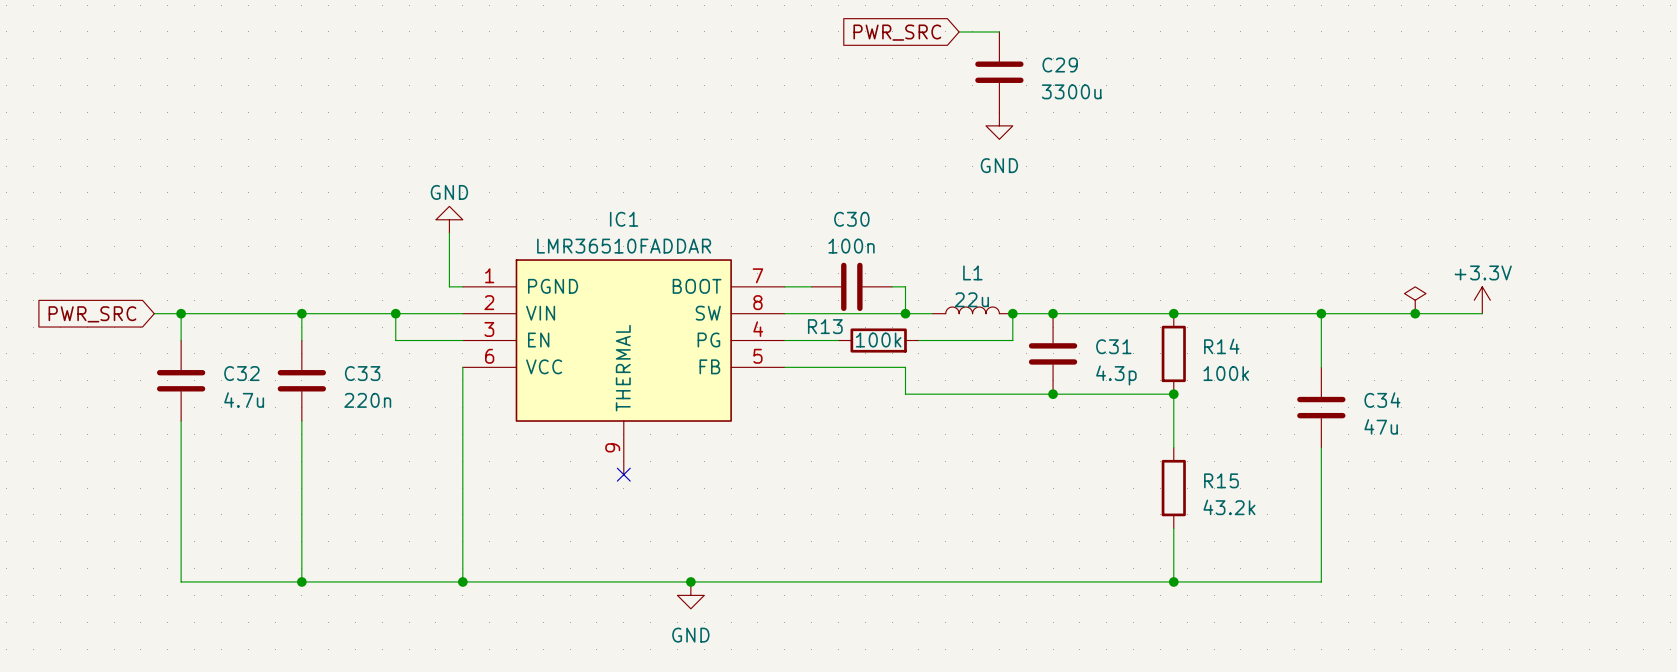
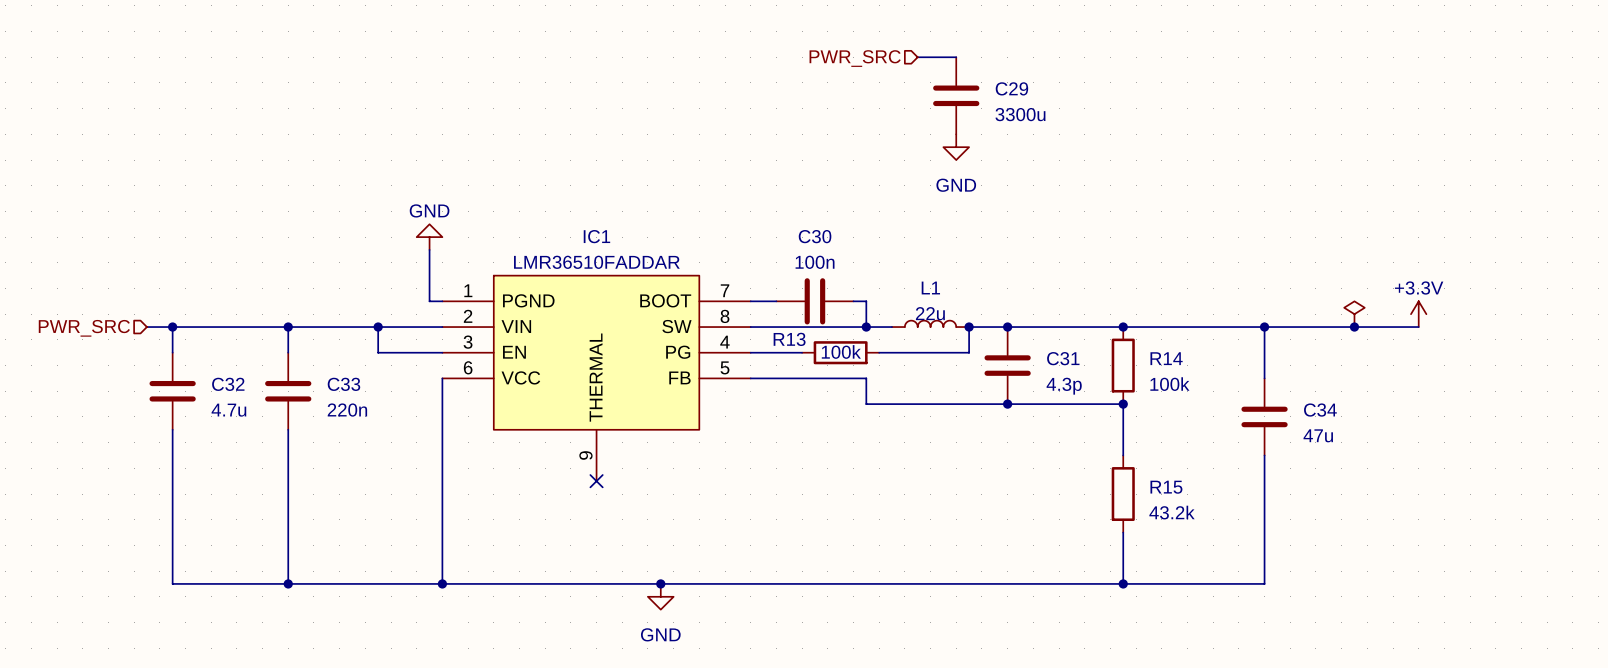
hierarchical label: none -> PWR_SRC (855, 58)
global label: PWR_SRC (897, 32) -> none
hierarchical label: none -> PWR_SRC (84, 328)
global label: PWR_SRC (92, 314) -> none

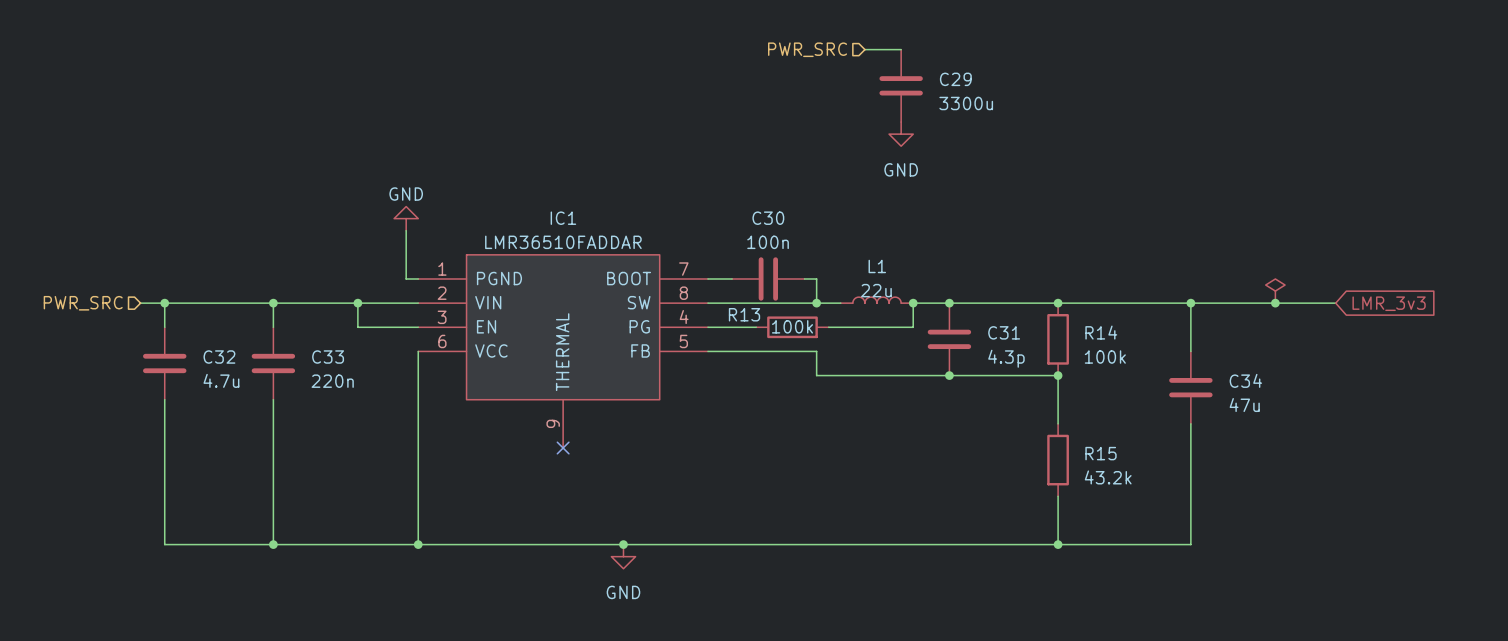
power symbol: +3.3V (1418, 314) -> none
global label: none -> LMR_3v3 (1389, 303)

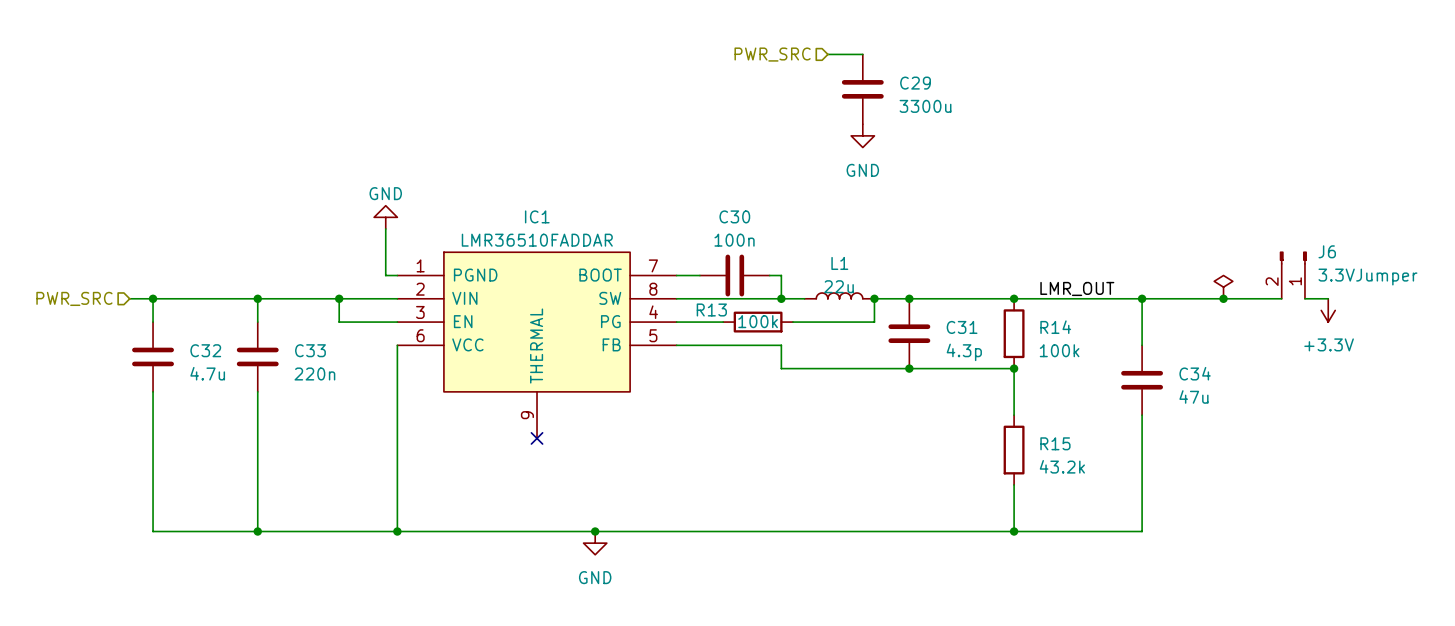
J6: none -> 3.3VJumper (1293, 275)
label: none -> LMR_OUT (1077, 288)
wire: none -> (1304, 298) (1328, 298)
global label: LMR_3v3 (1389, 303) -> none
power symbol: none -> +3.3V (1328, 310)

